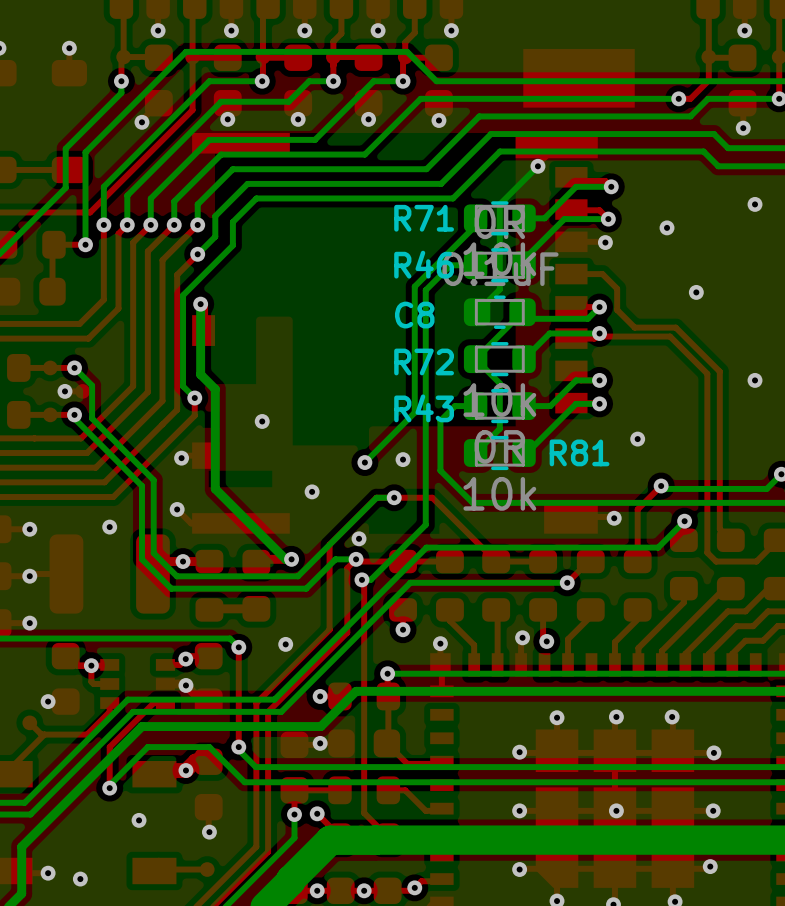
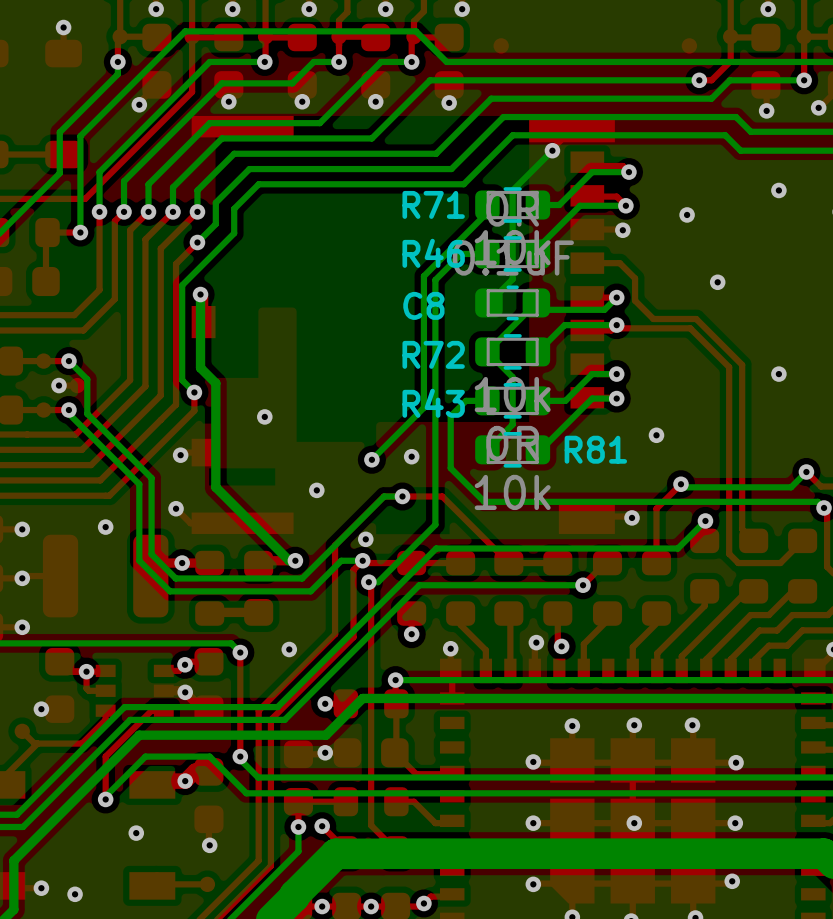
part: none -> (501, 45)
part: none -> (689, 45)
part: (579, 78) -> none

